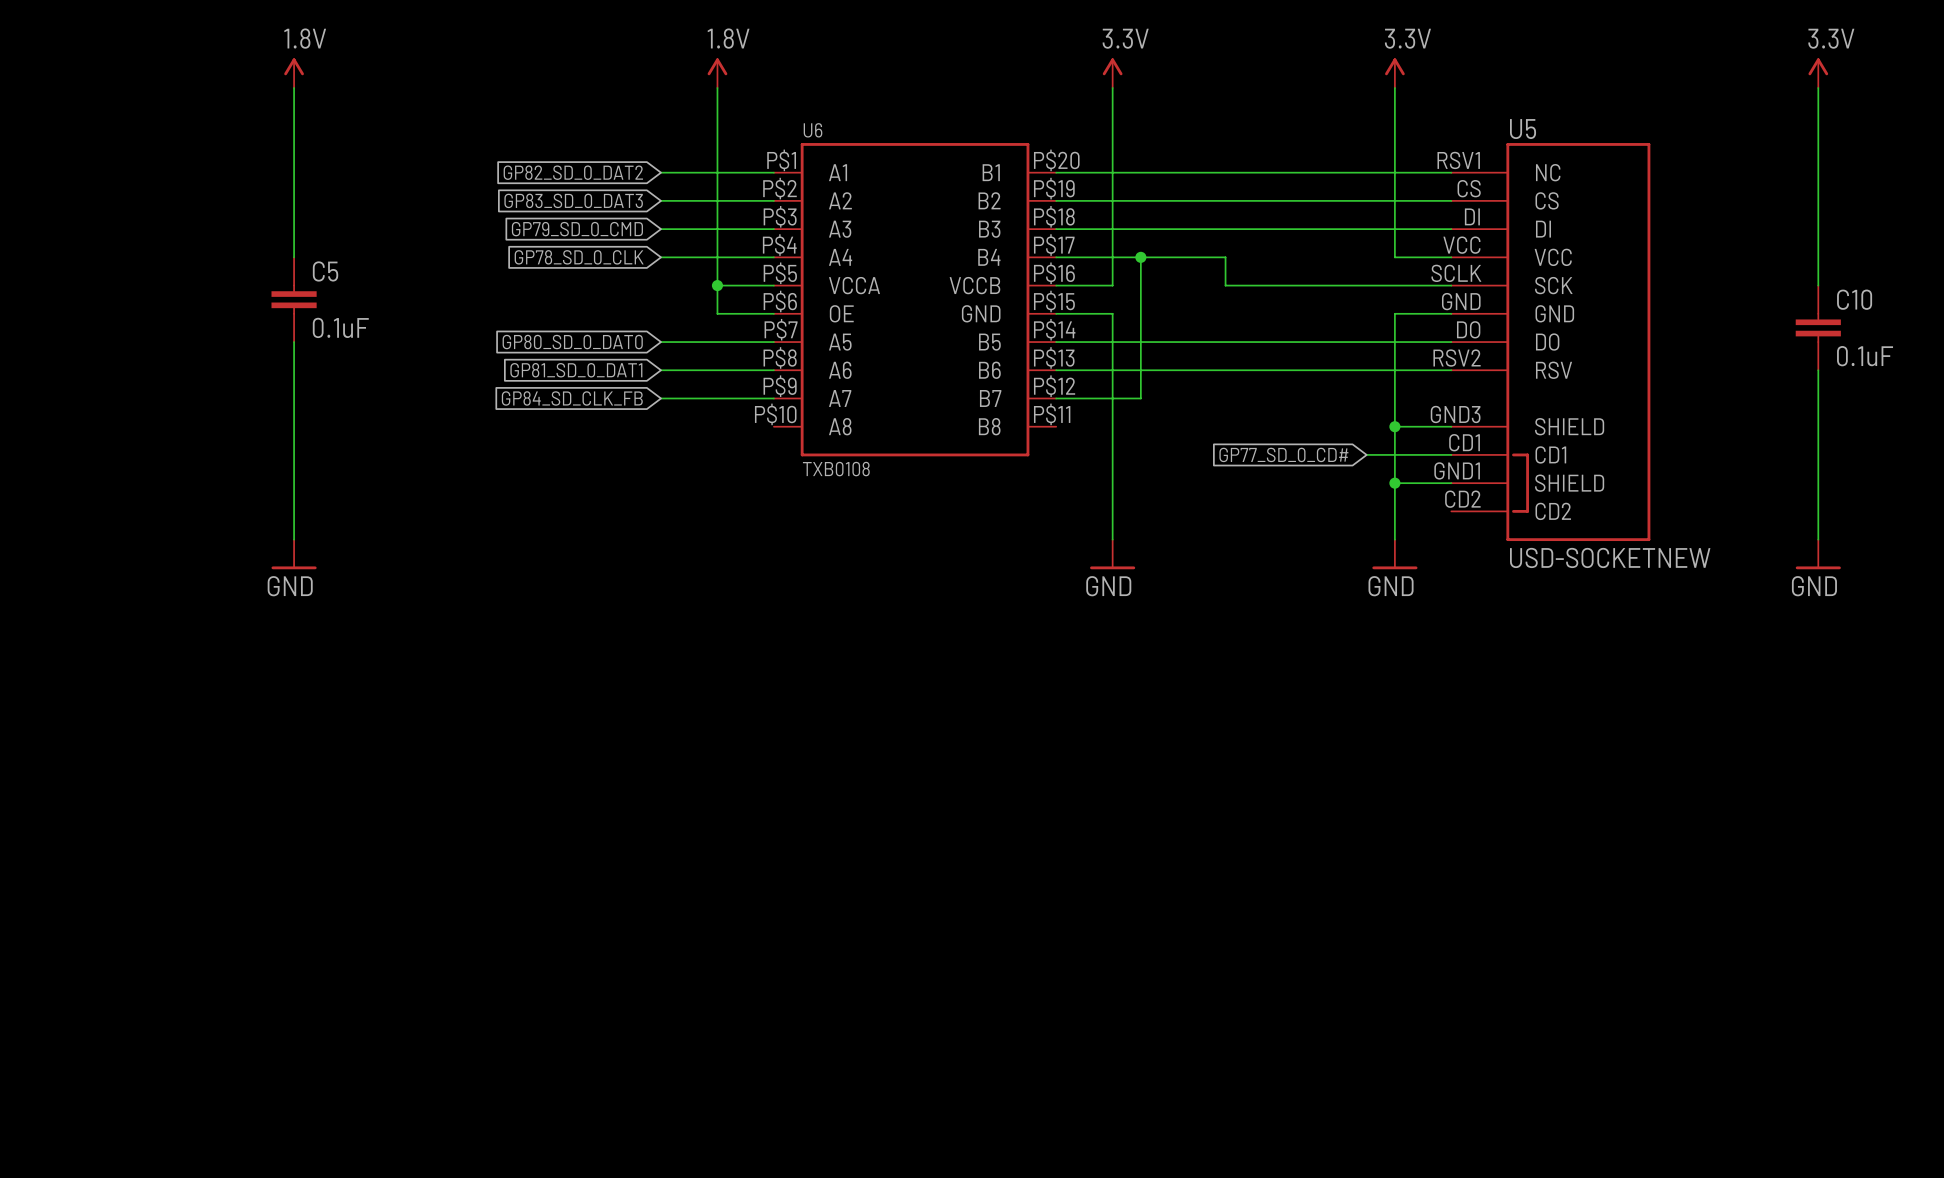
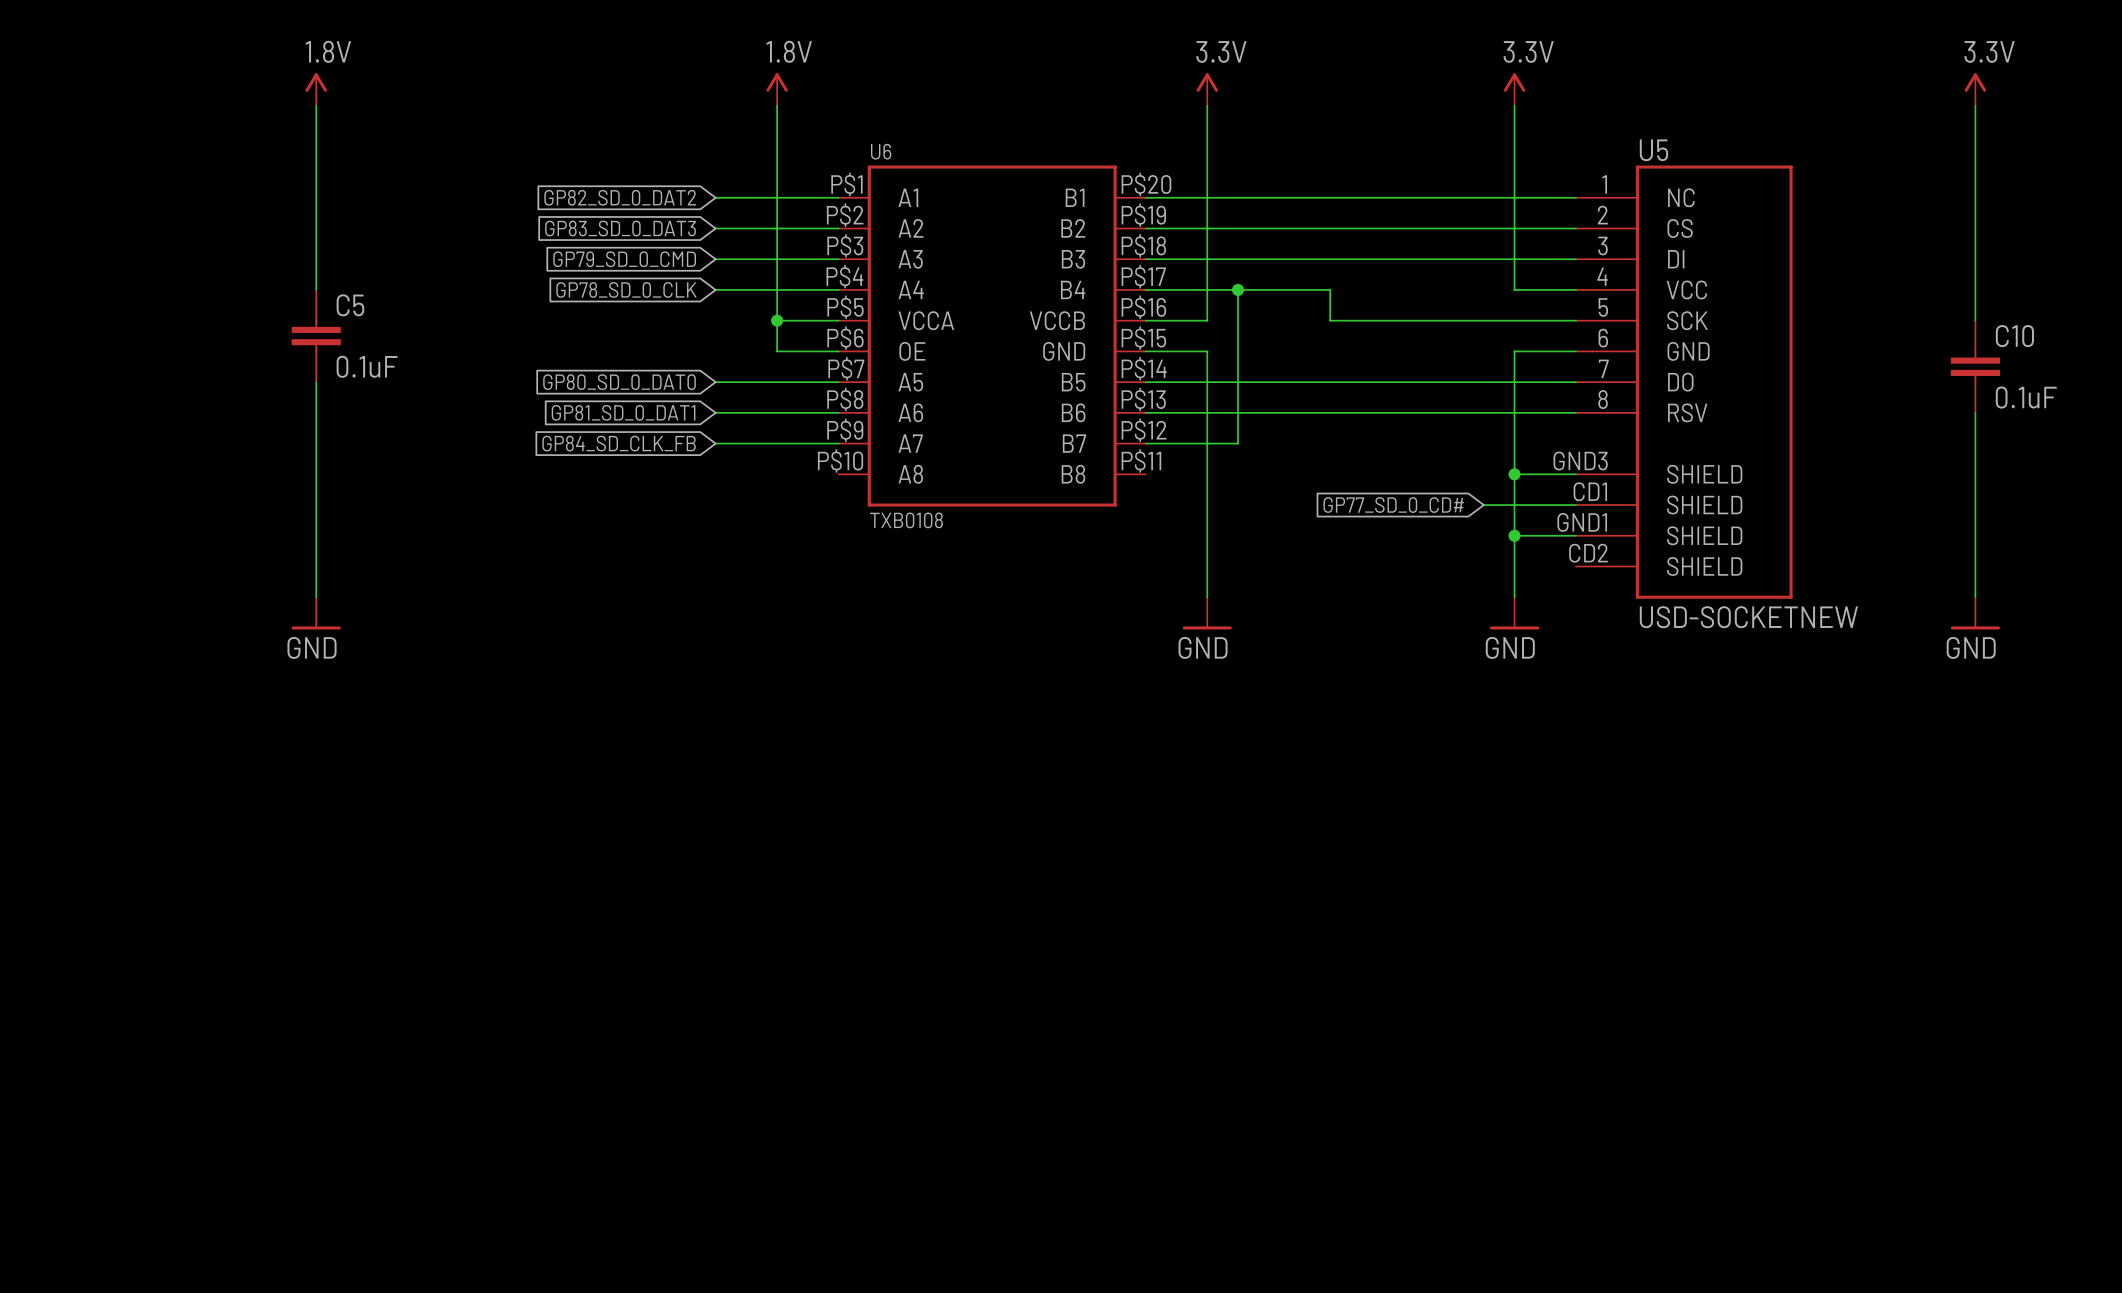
U5 symbol: [1451, 143, 1651, 542] -> [1575, 165, 1793, 599]

